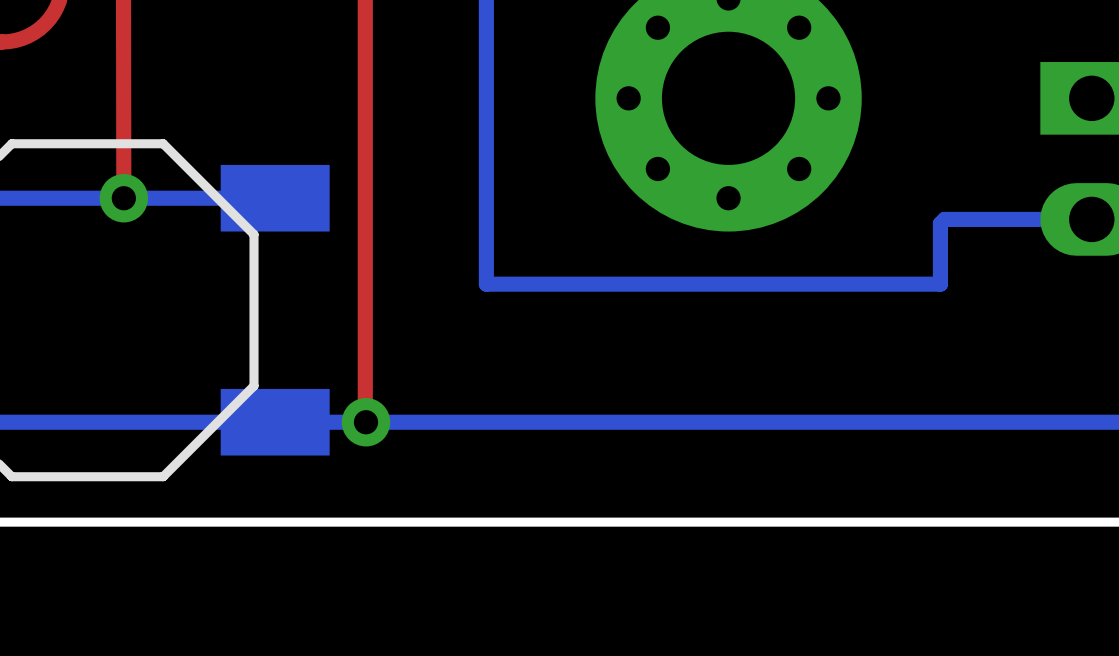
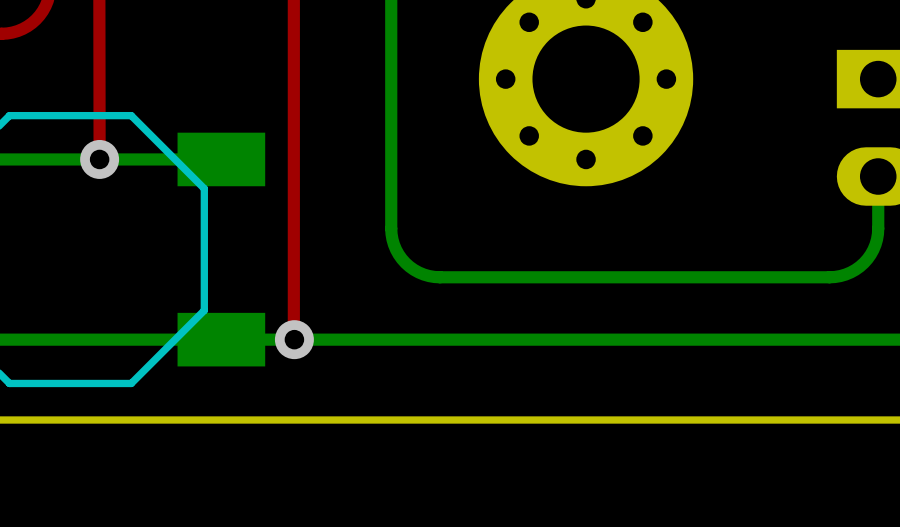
bottom track: (1091, 219) (944, 219) (940, 223) (940, 284) (486, 284) -> (878, 176) (877, 234) (873, 249) (859, 266) (845, 274) (834, 276) (434, 276) (418, 272) (405, 263) (396, 249) (391, 228)

